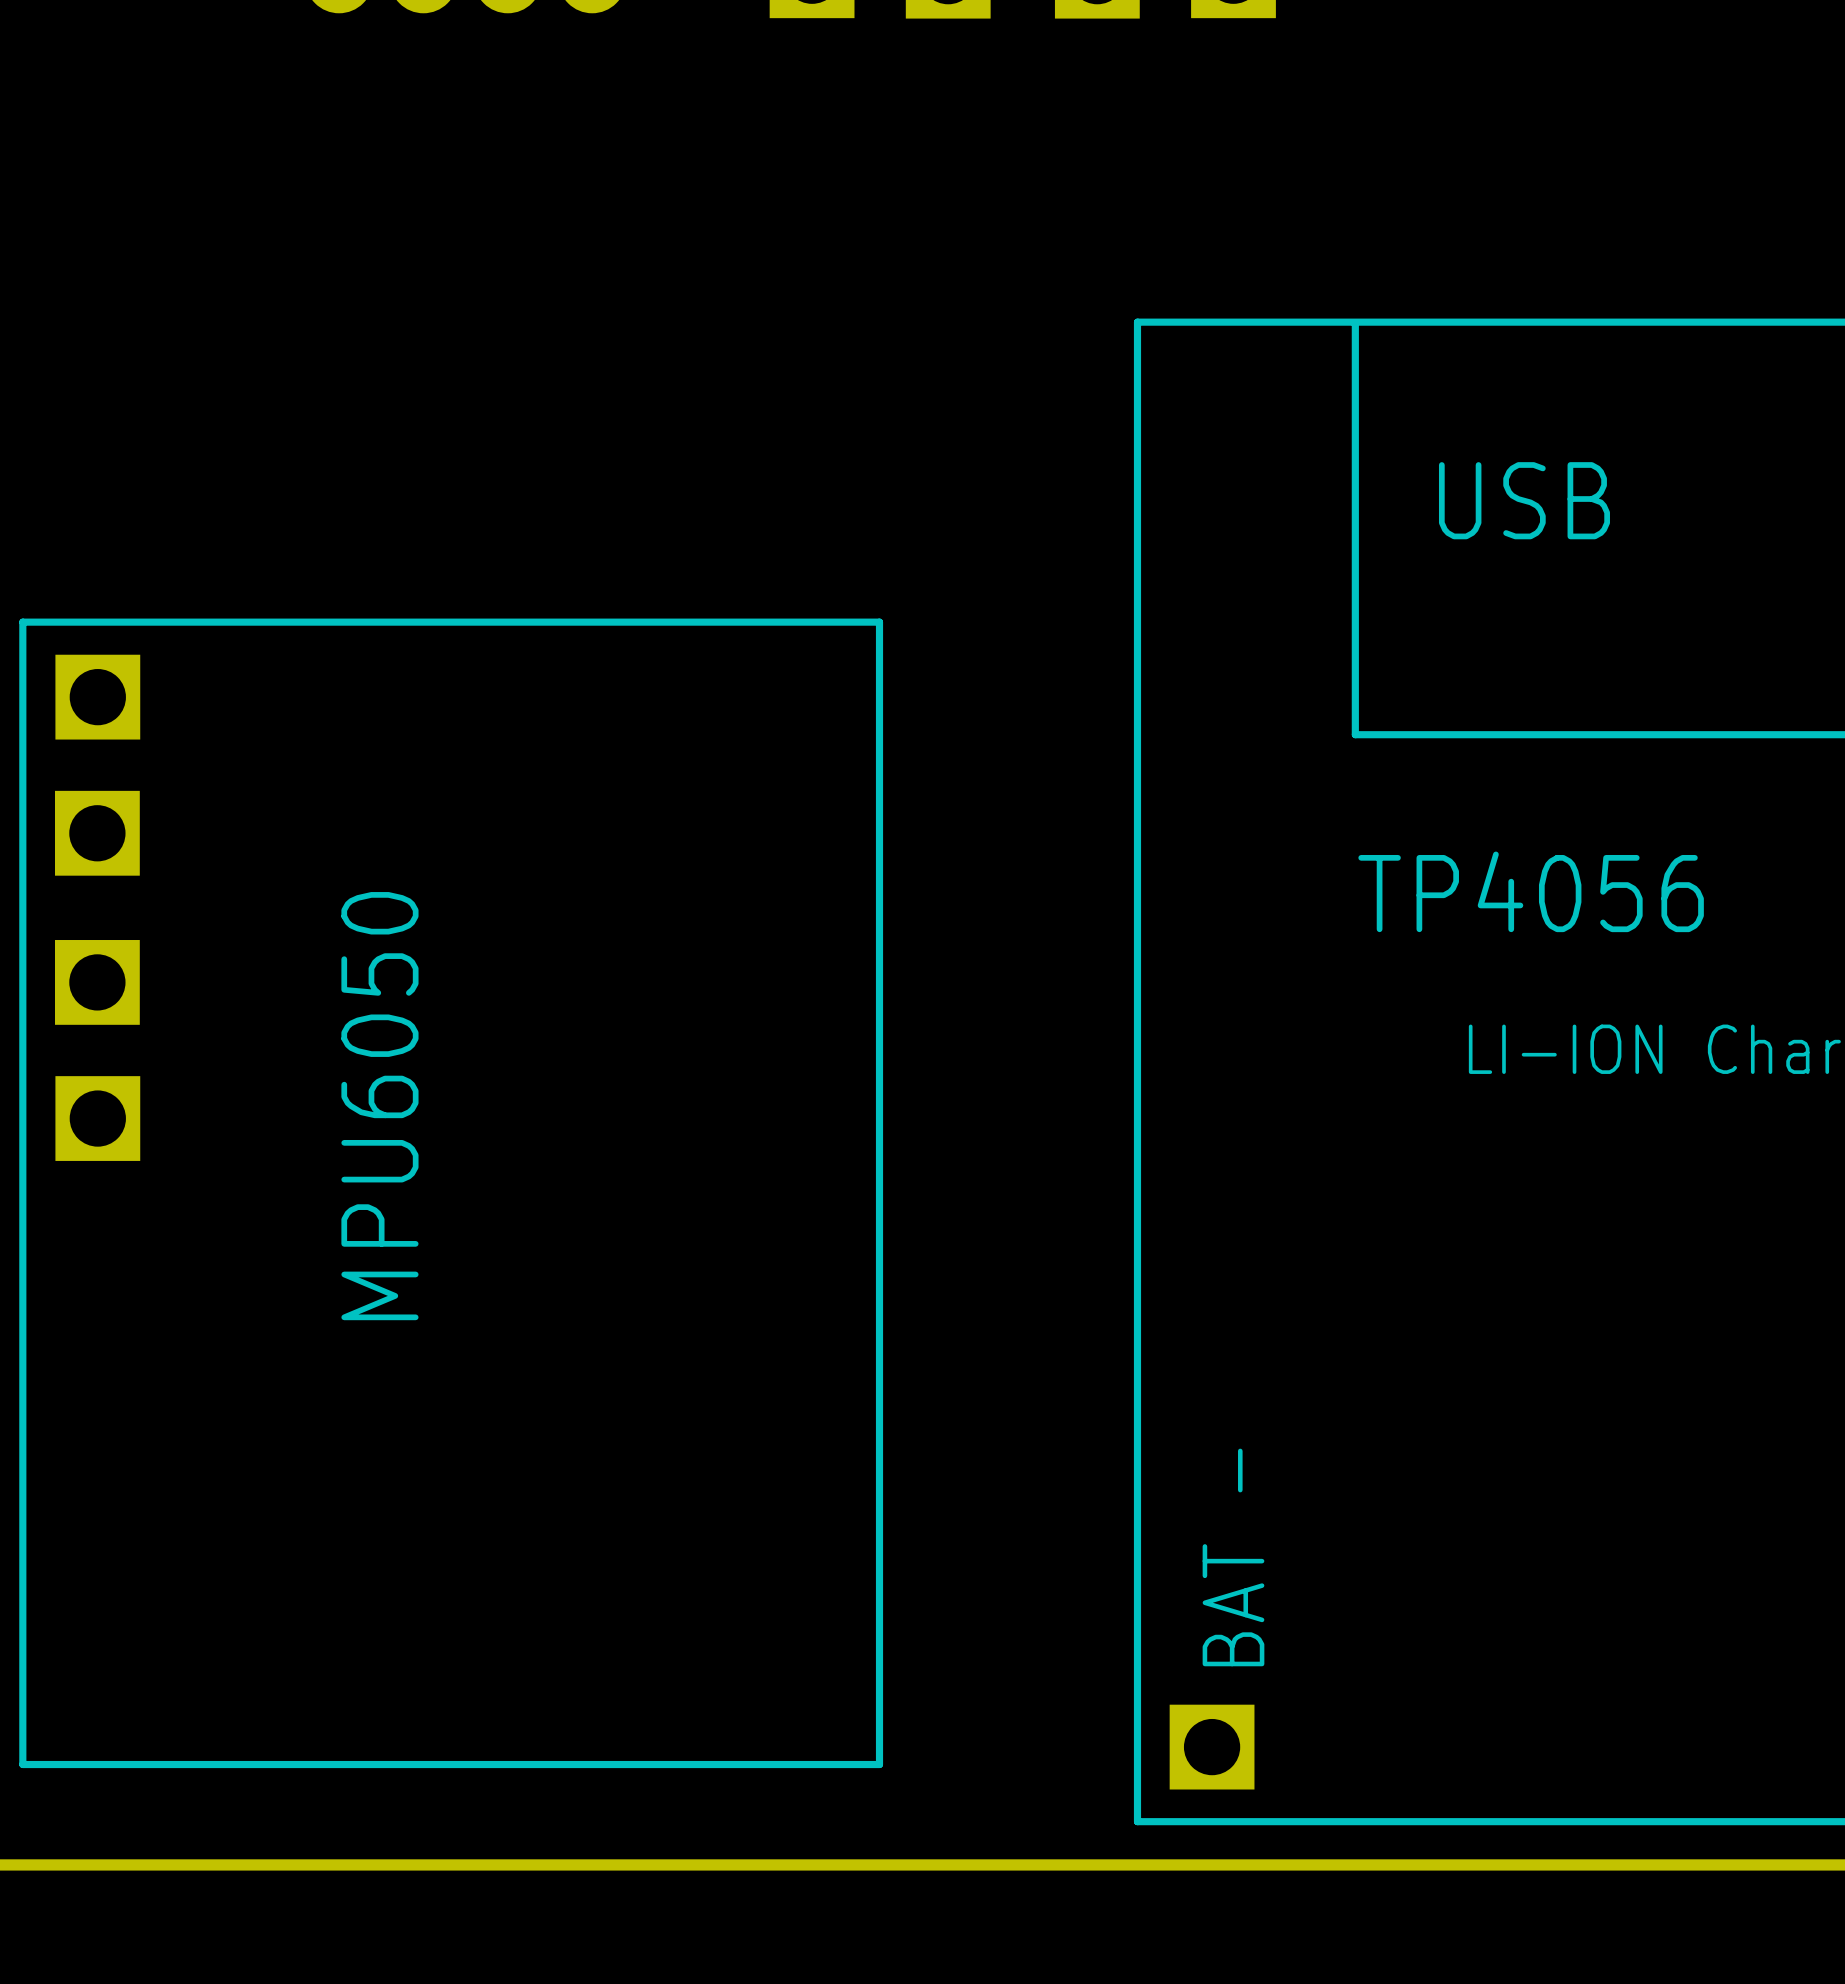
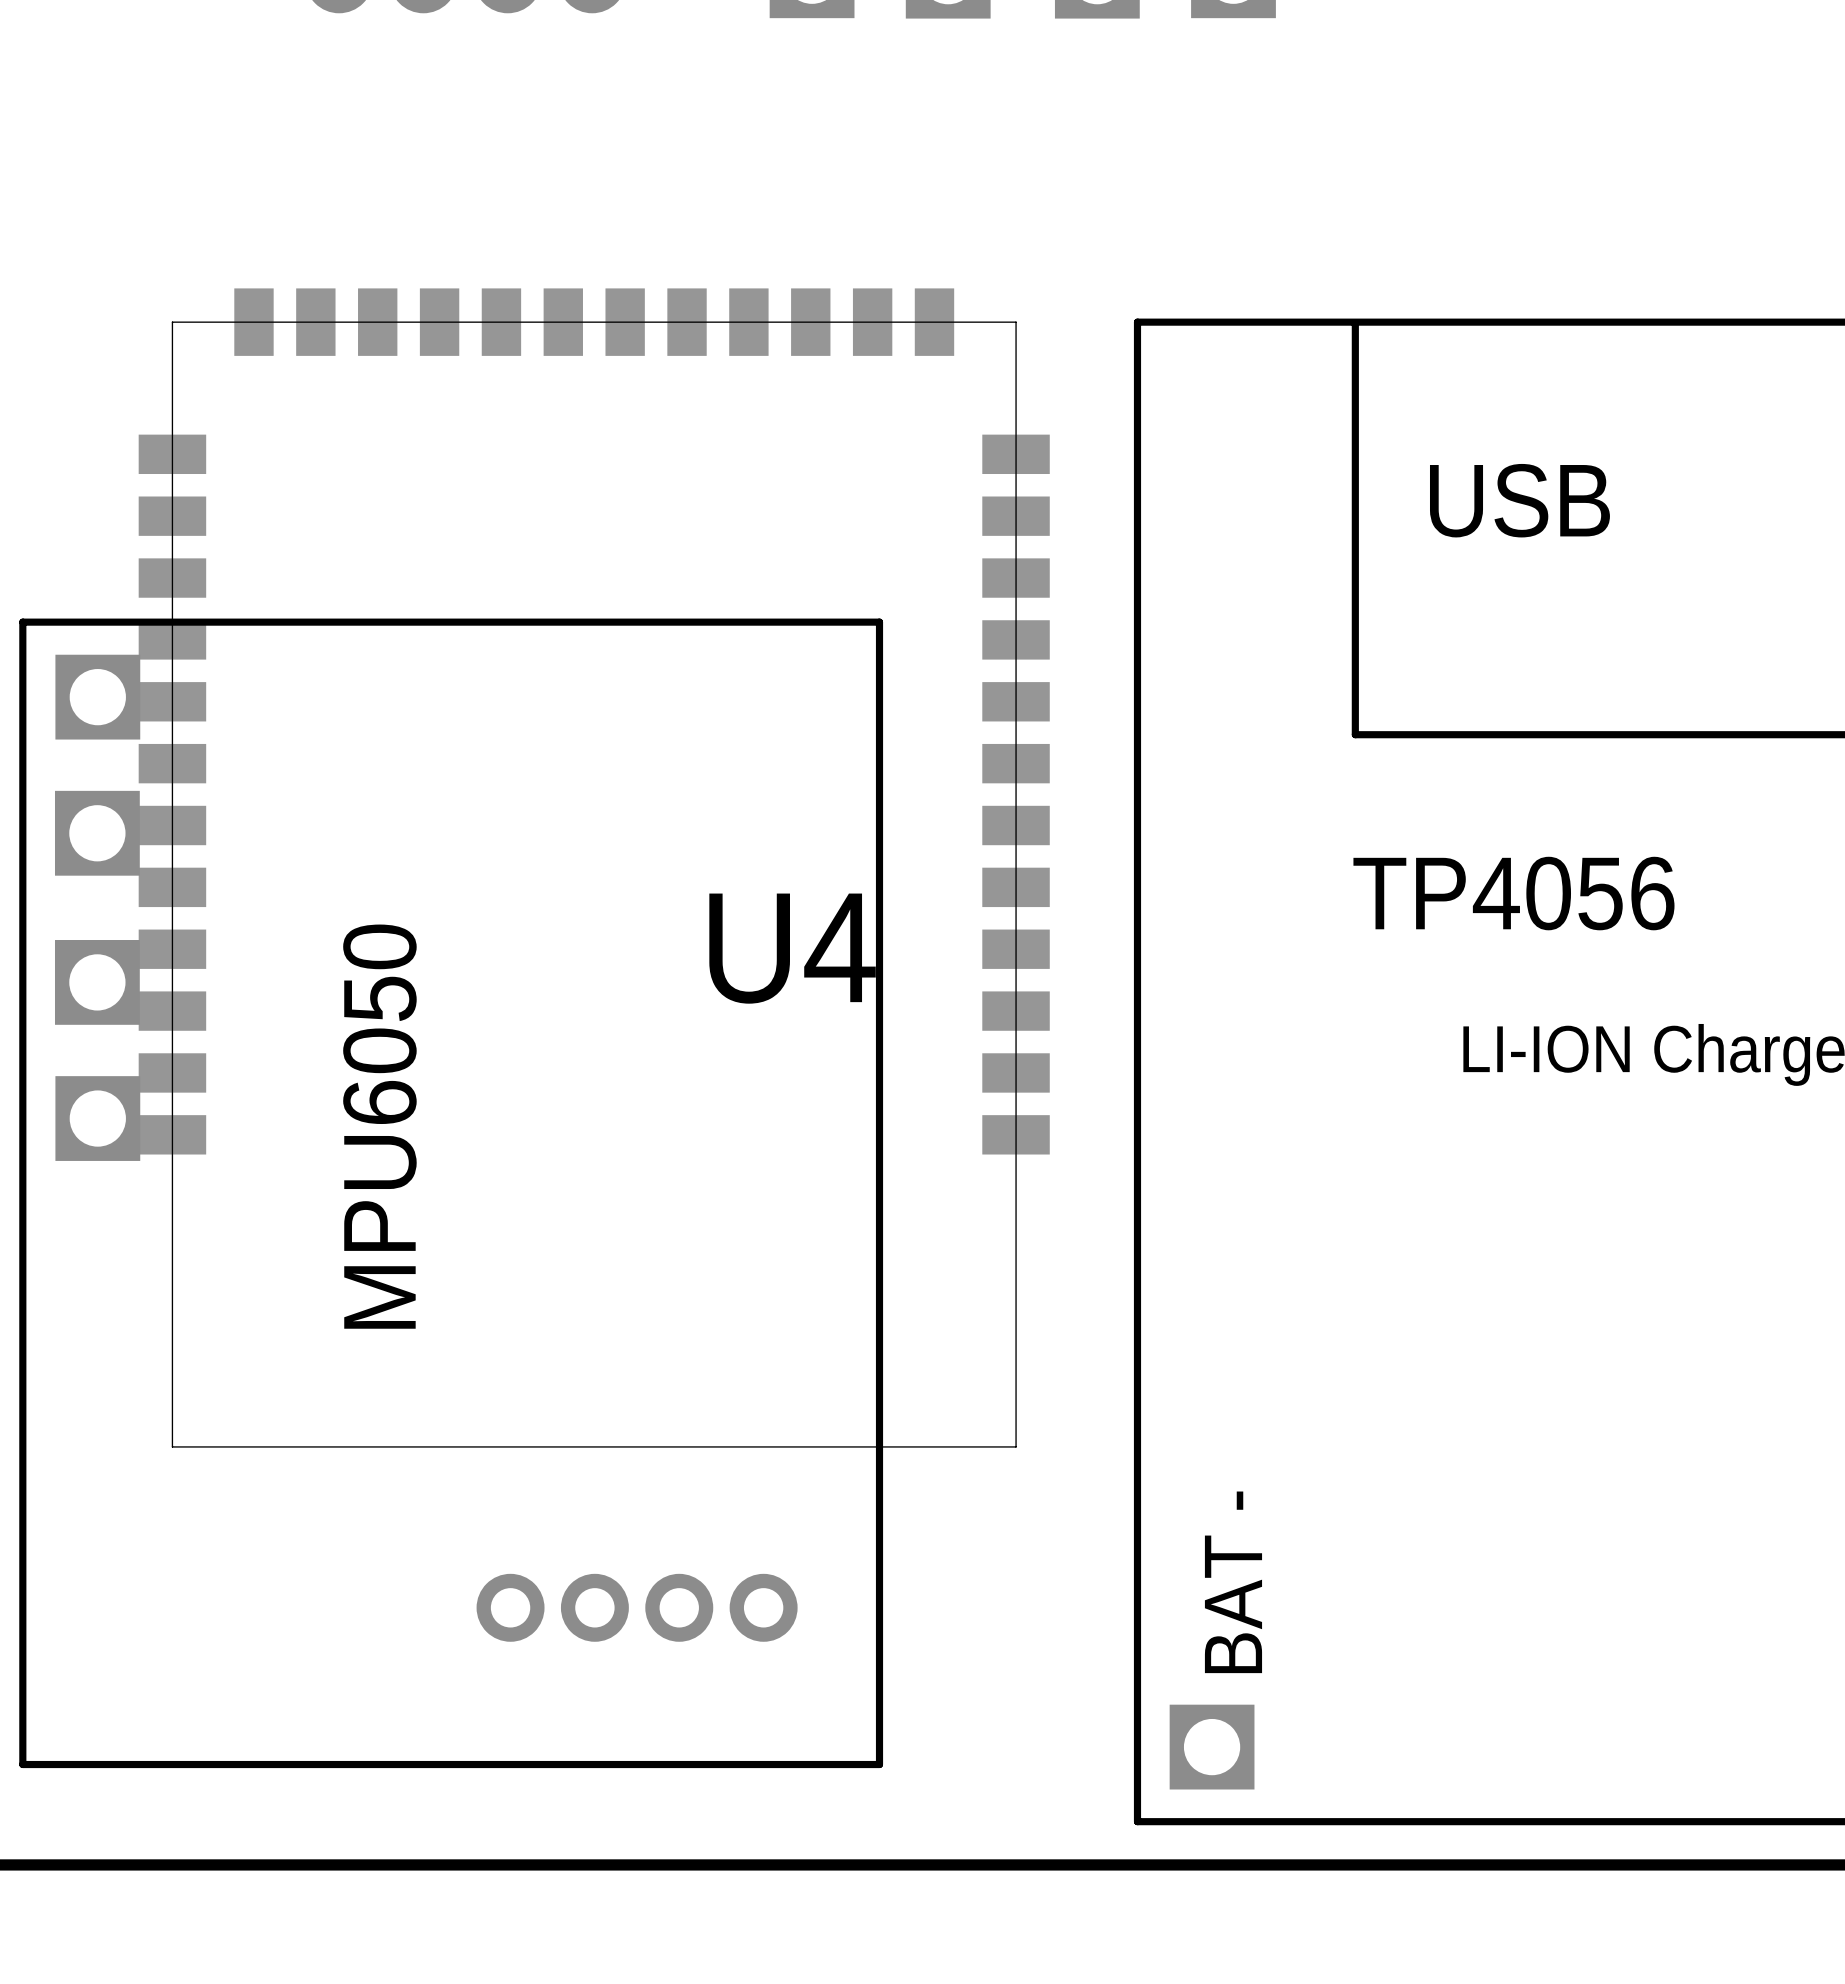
U4: none -> (594, 867)
part: none -> (637, 1607)

